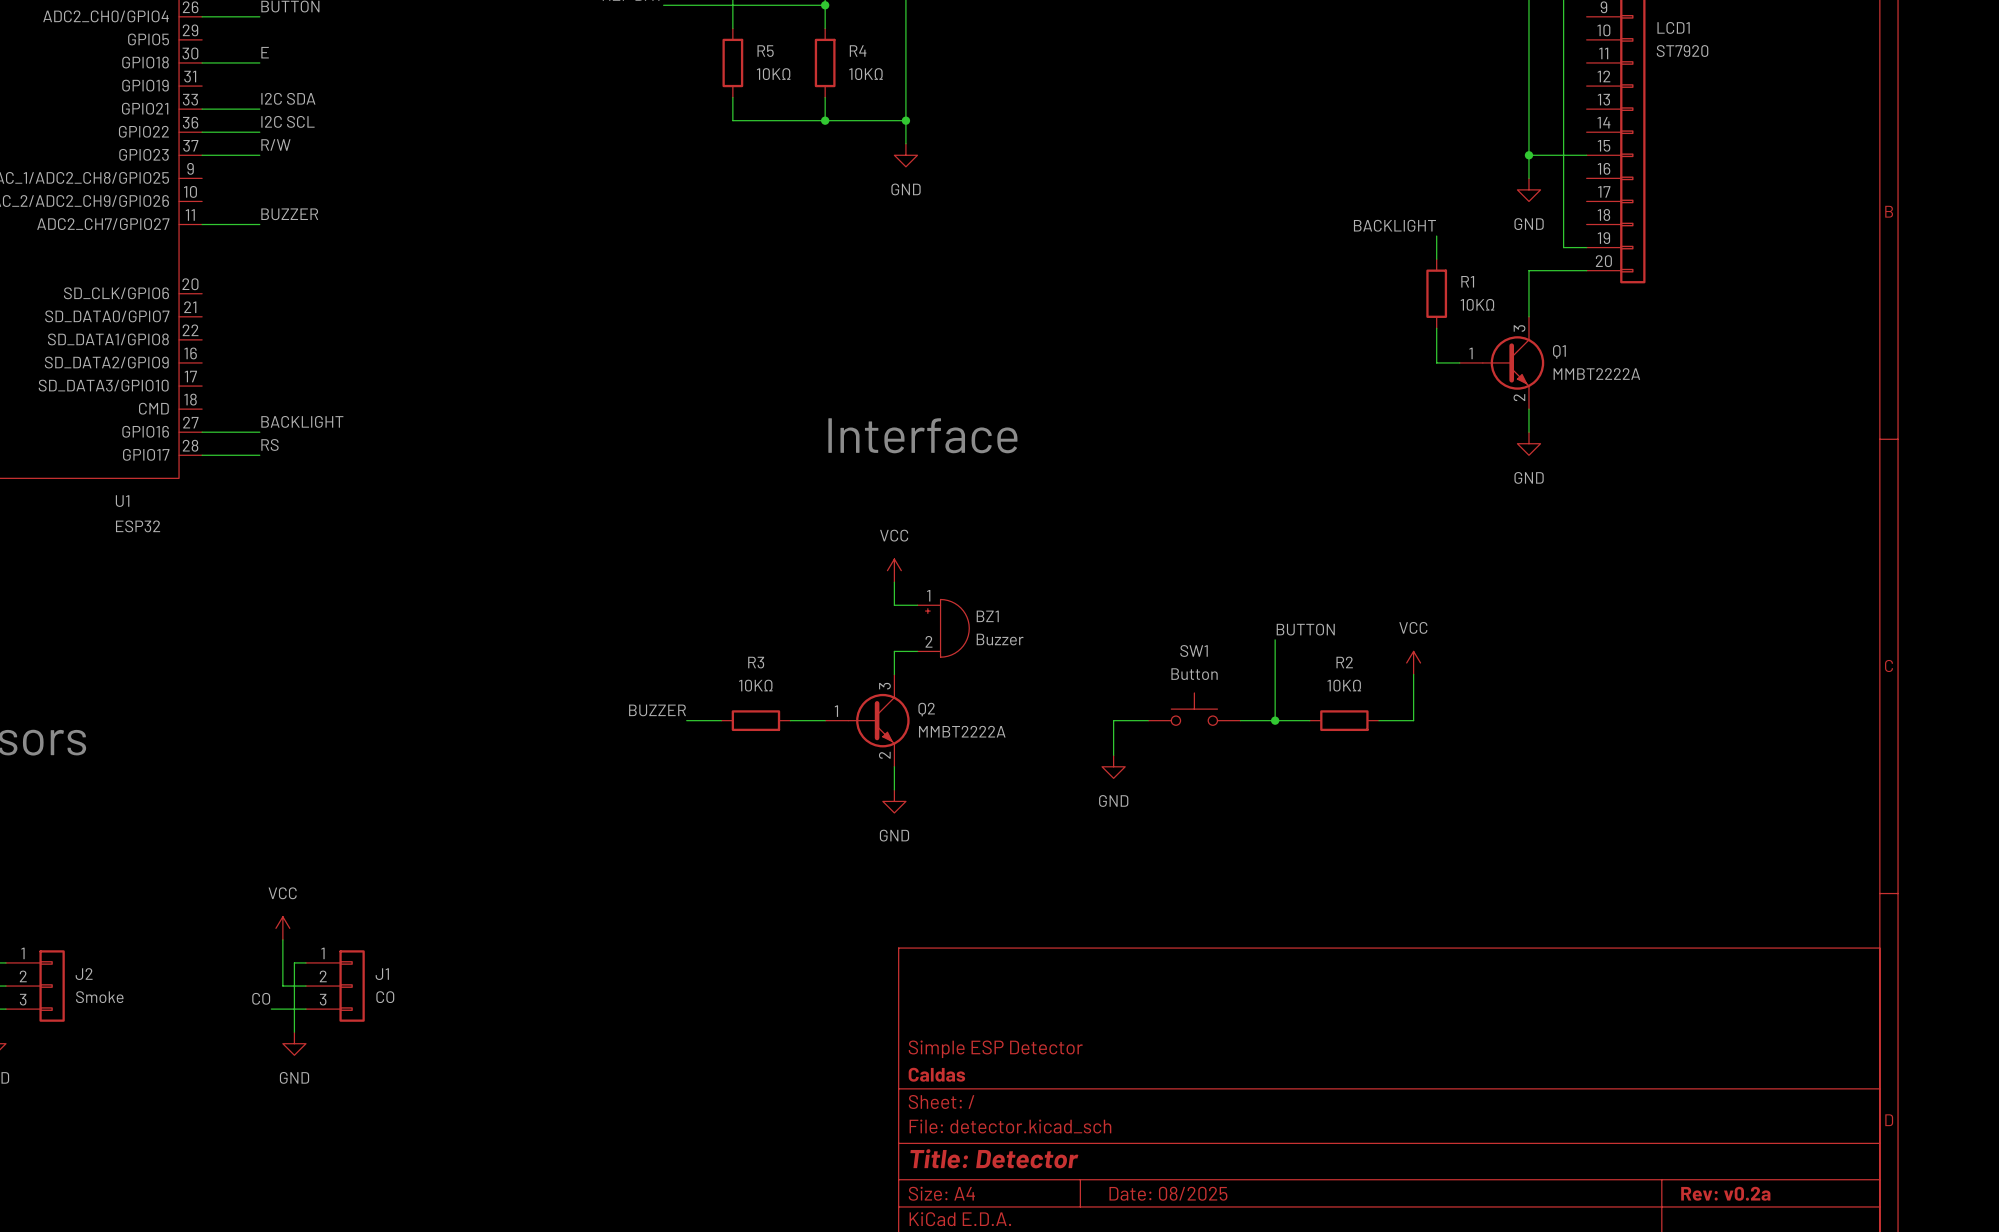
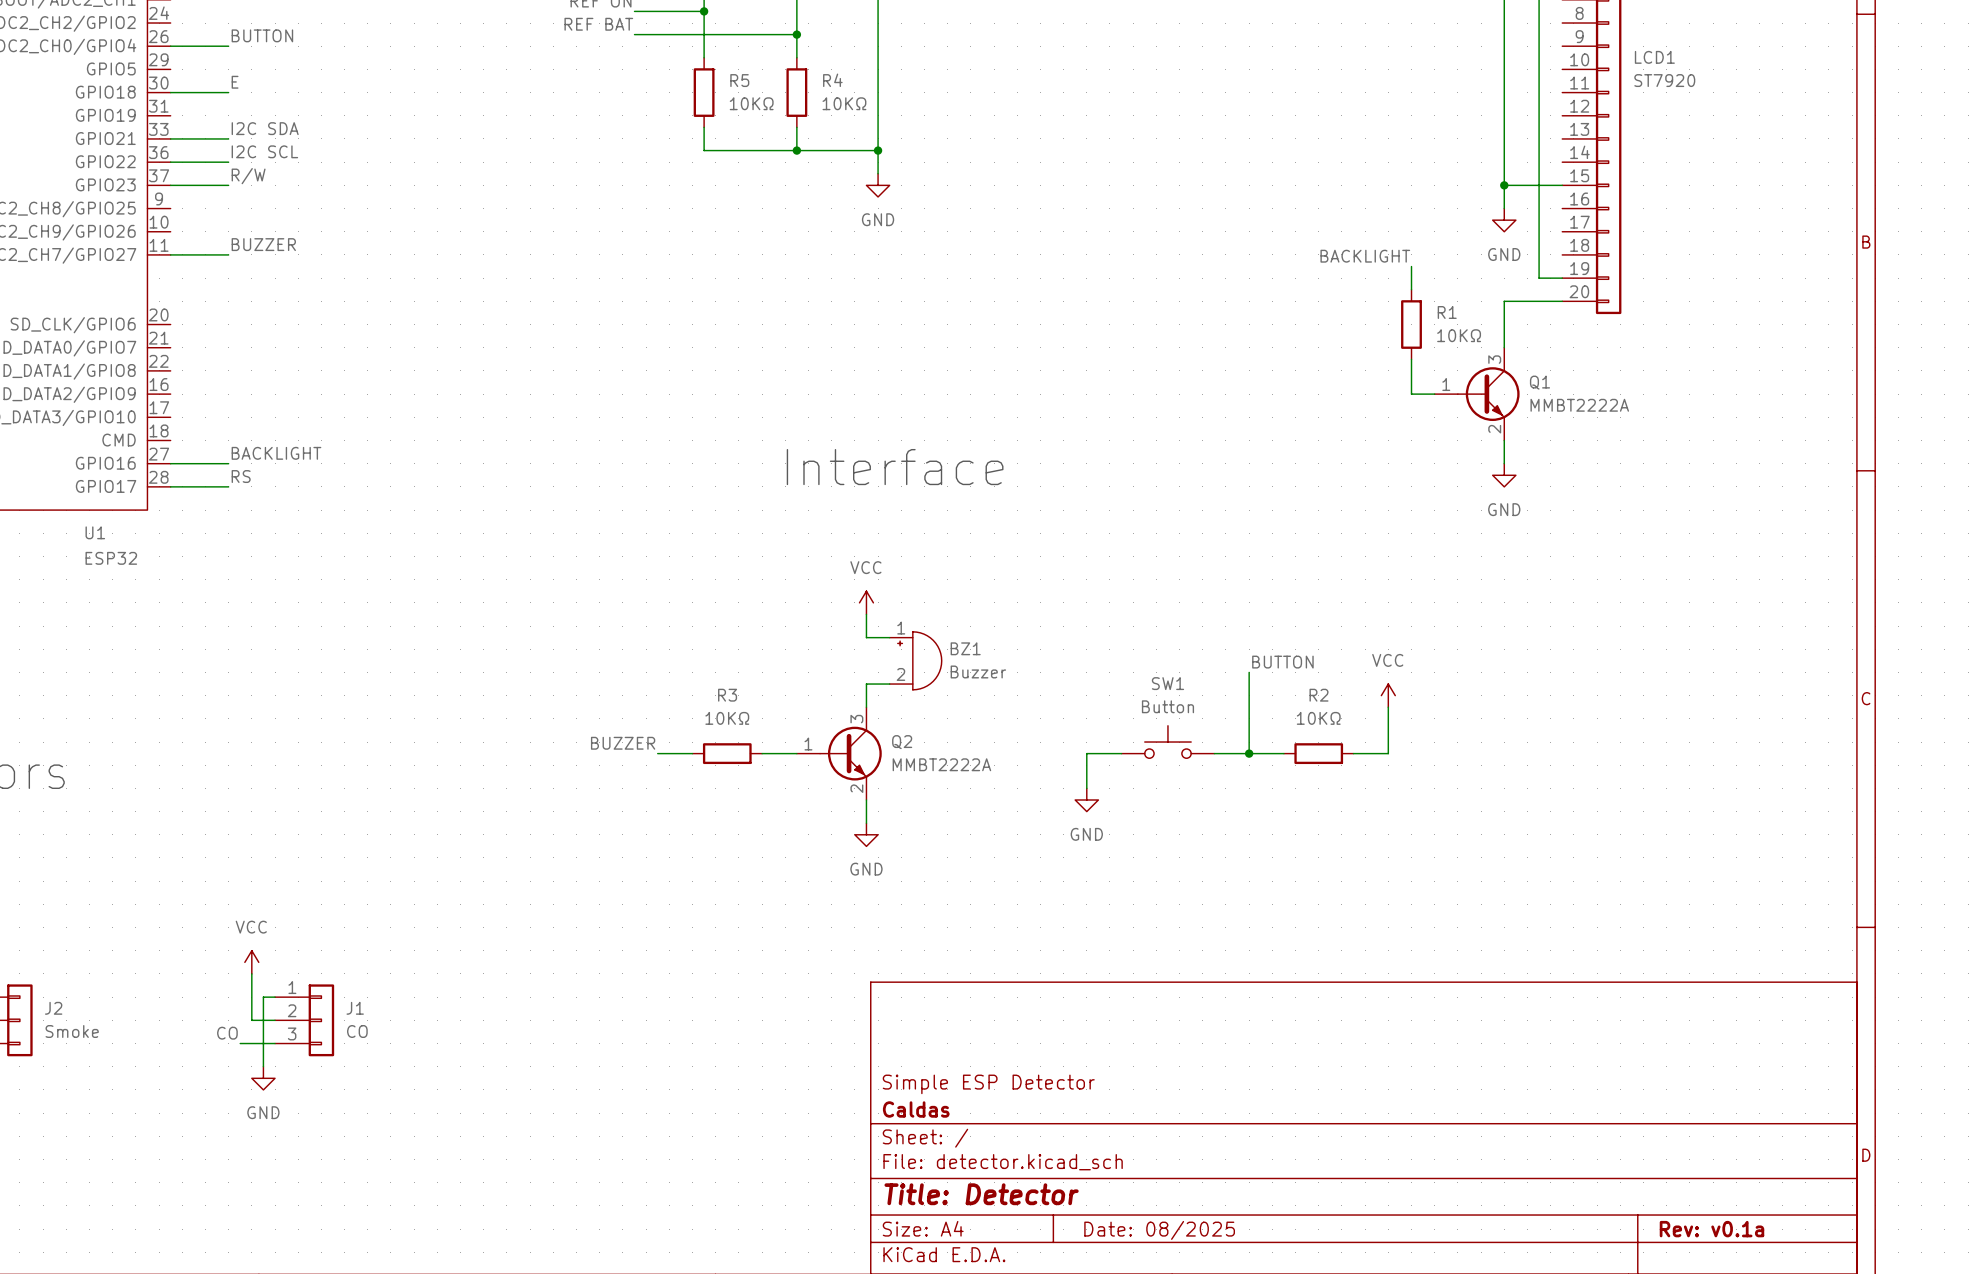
title block: Rev: v0.2a (1725, 1193) -> Rev: v0.1a (1711, 1229)

